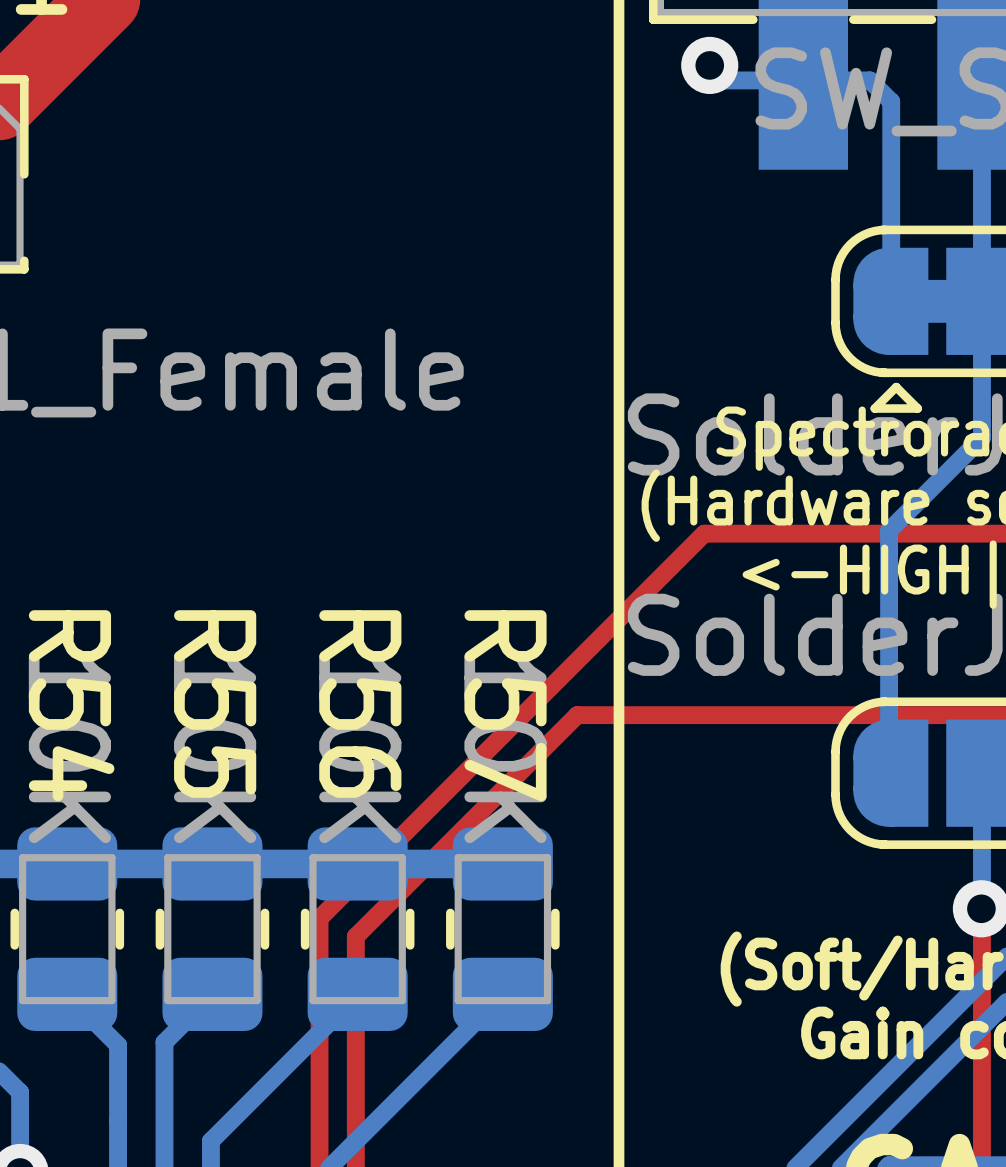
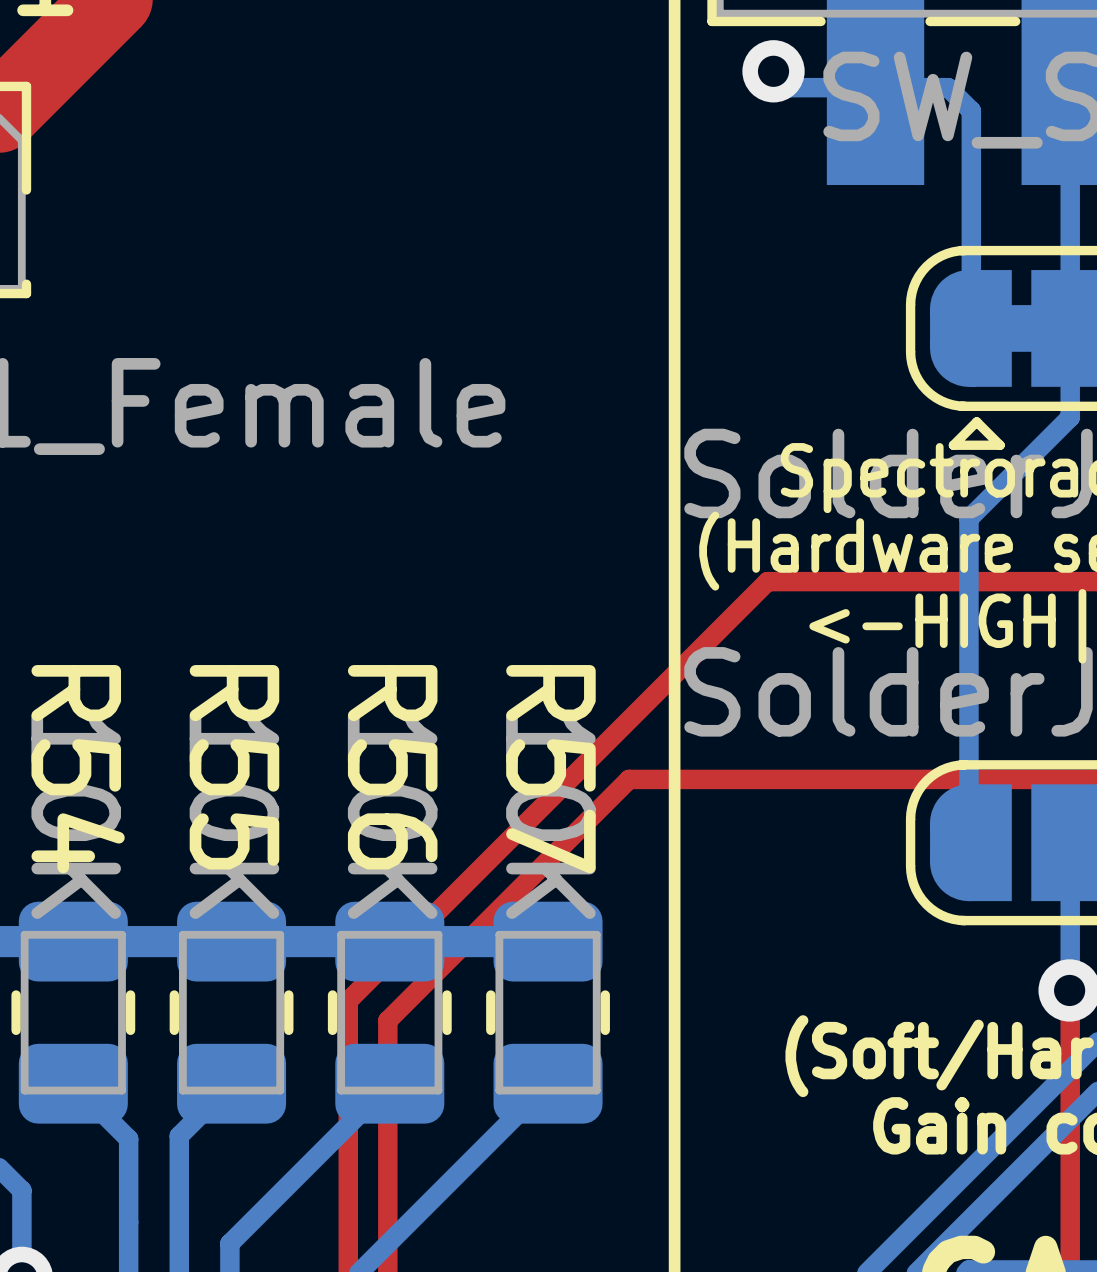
bottom track: (981, 383) (981, 437) (889, 530) -> (1070, 417) (968, 518) (968, 578)

